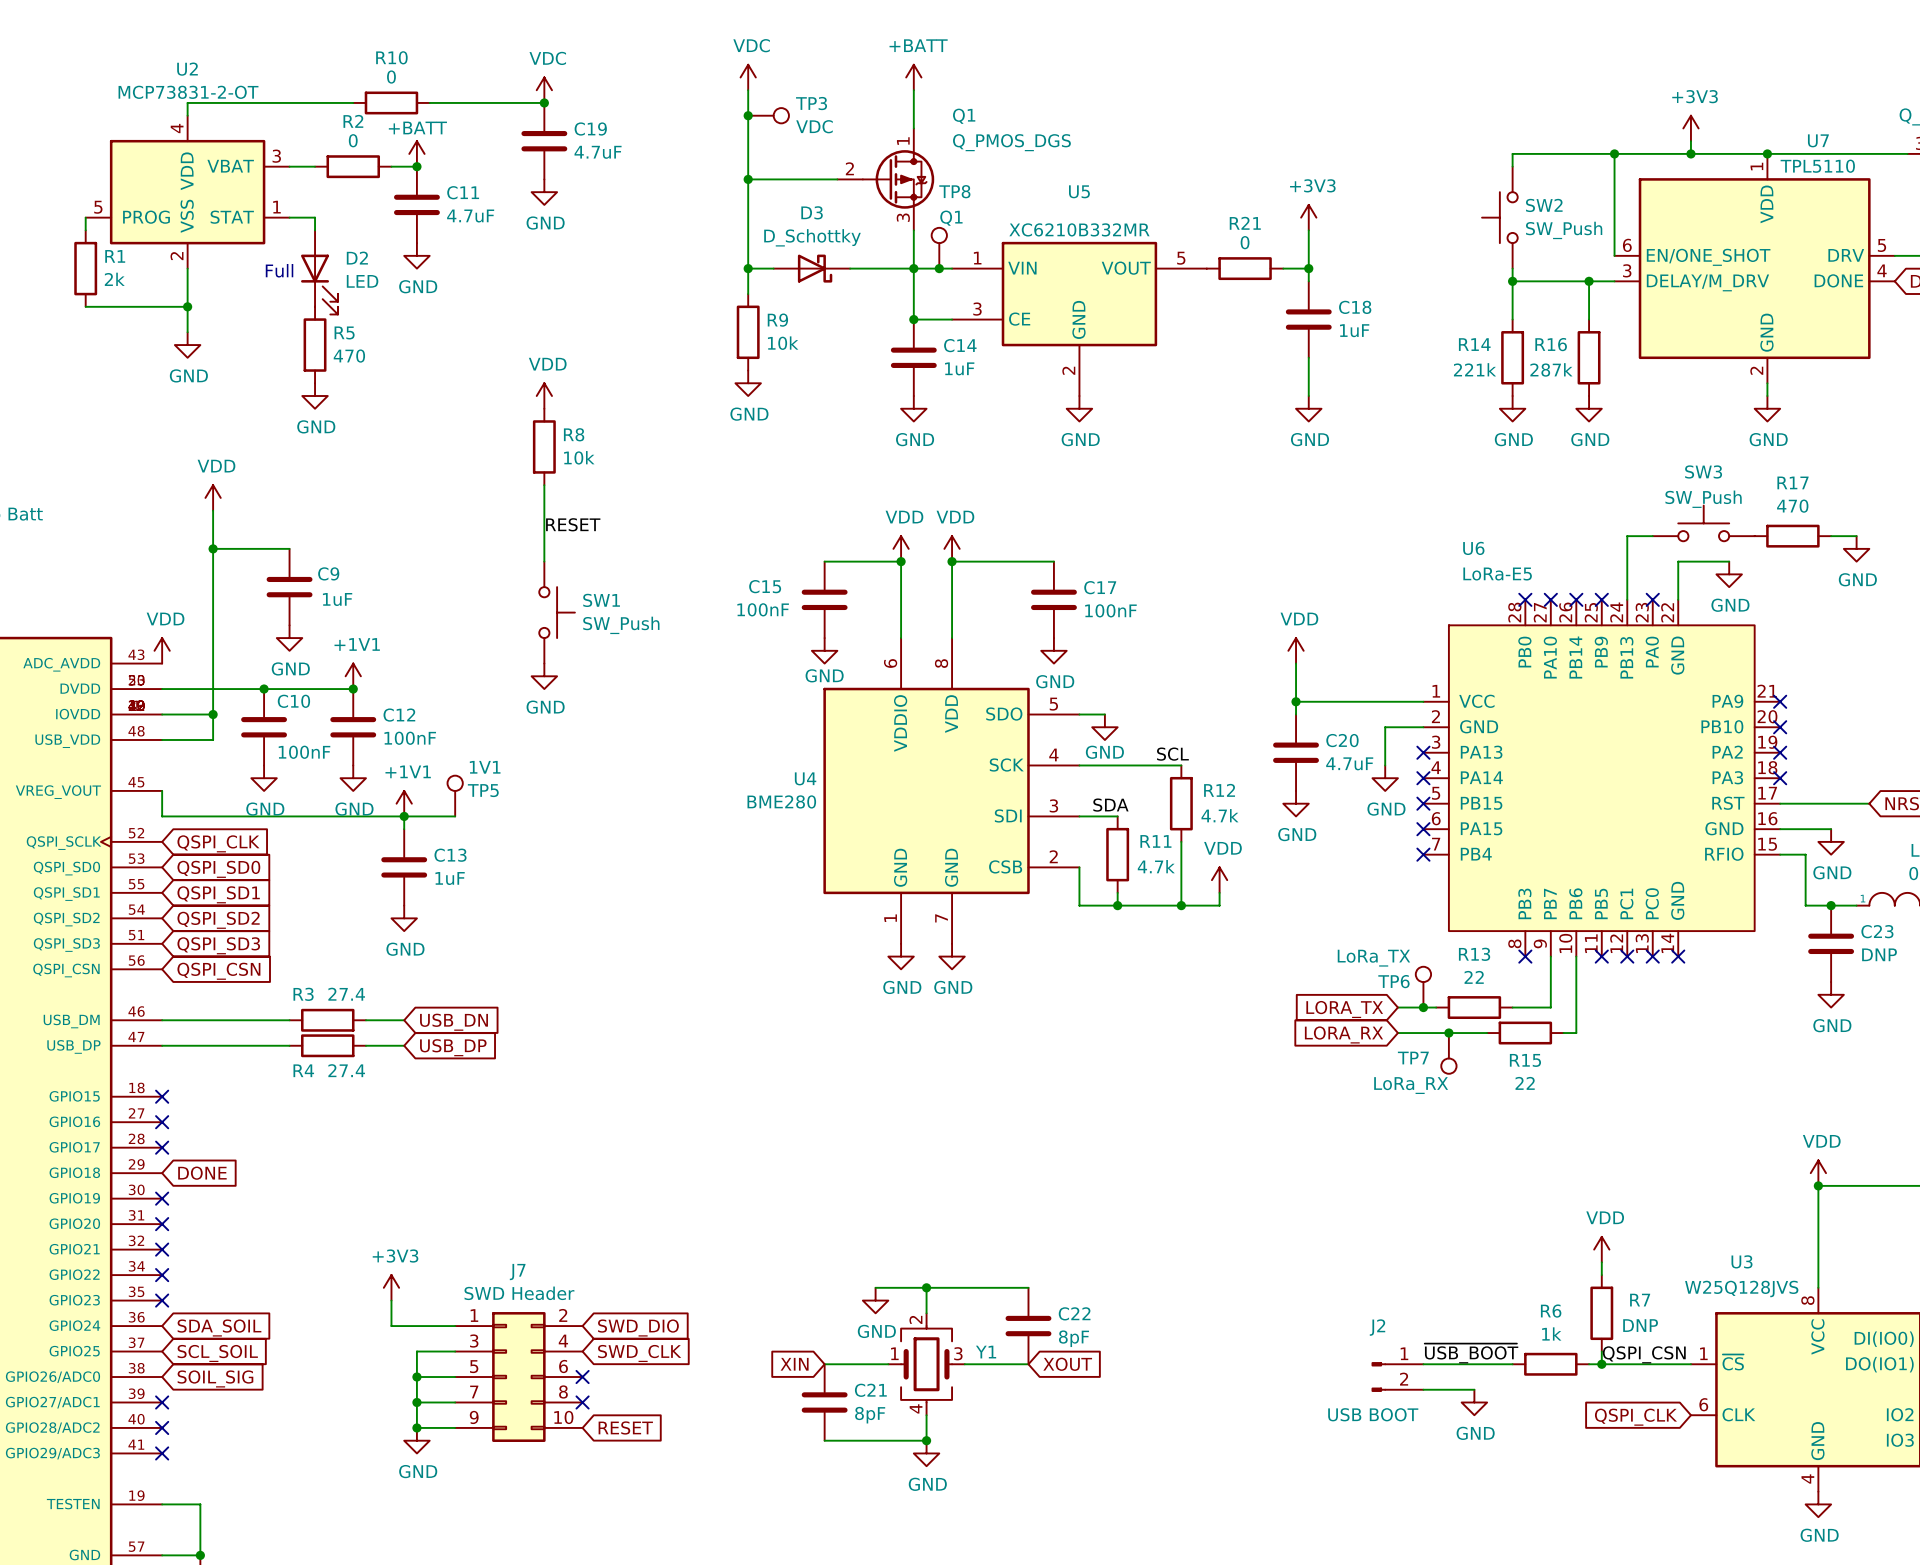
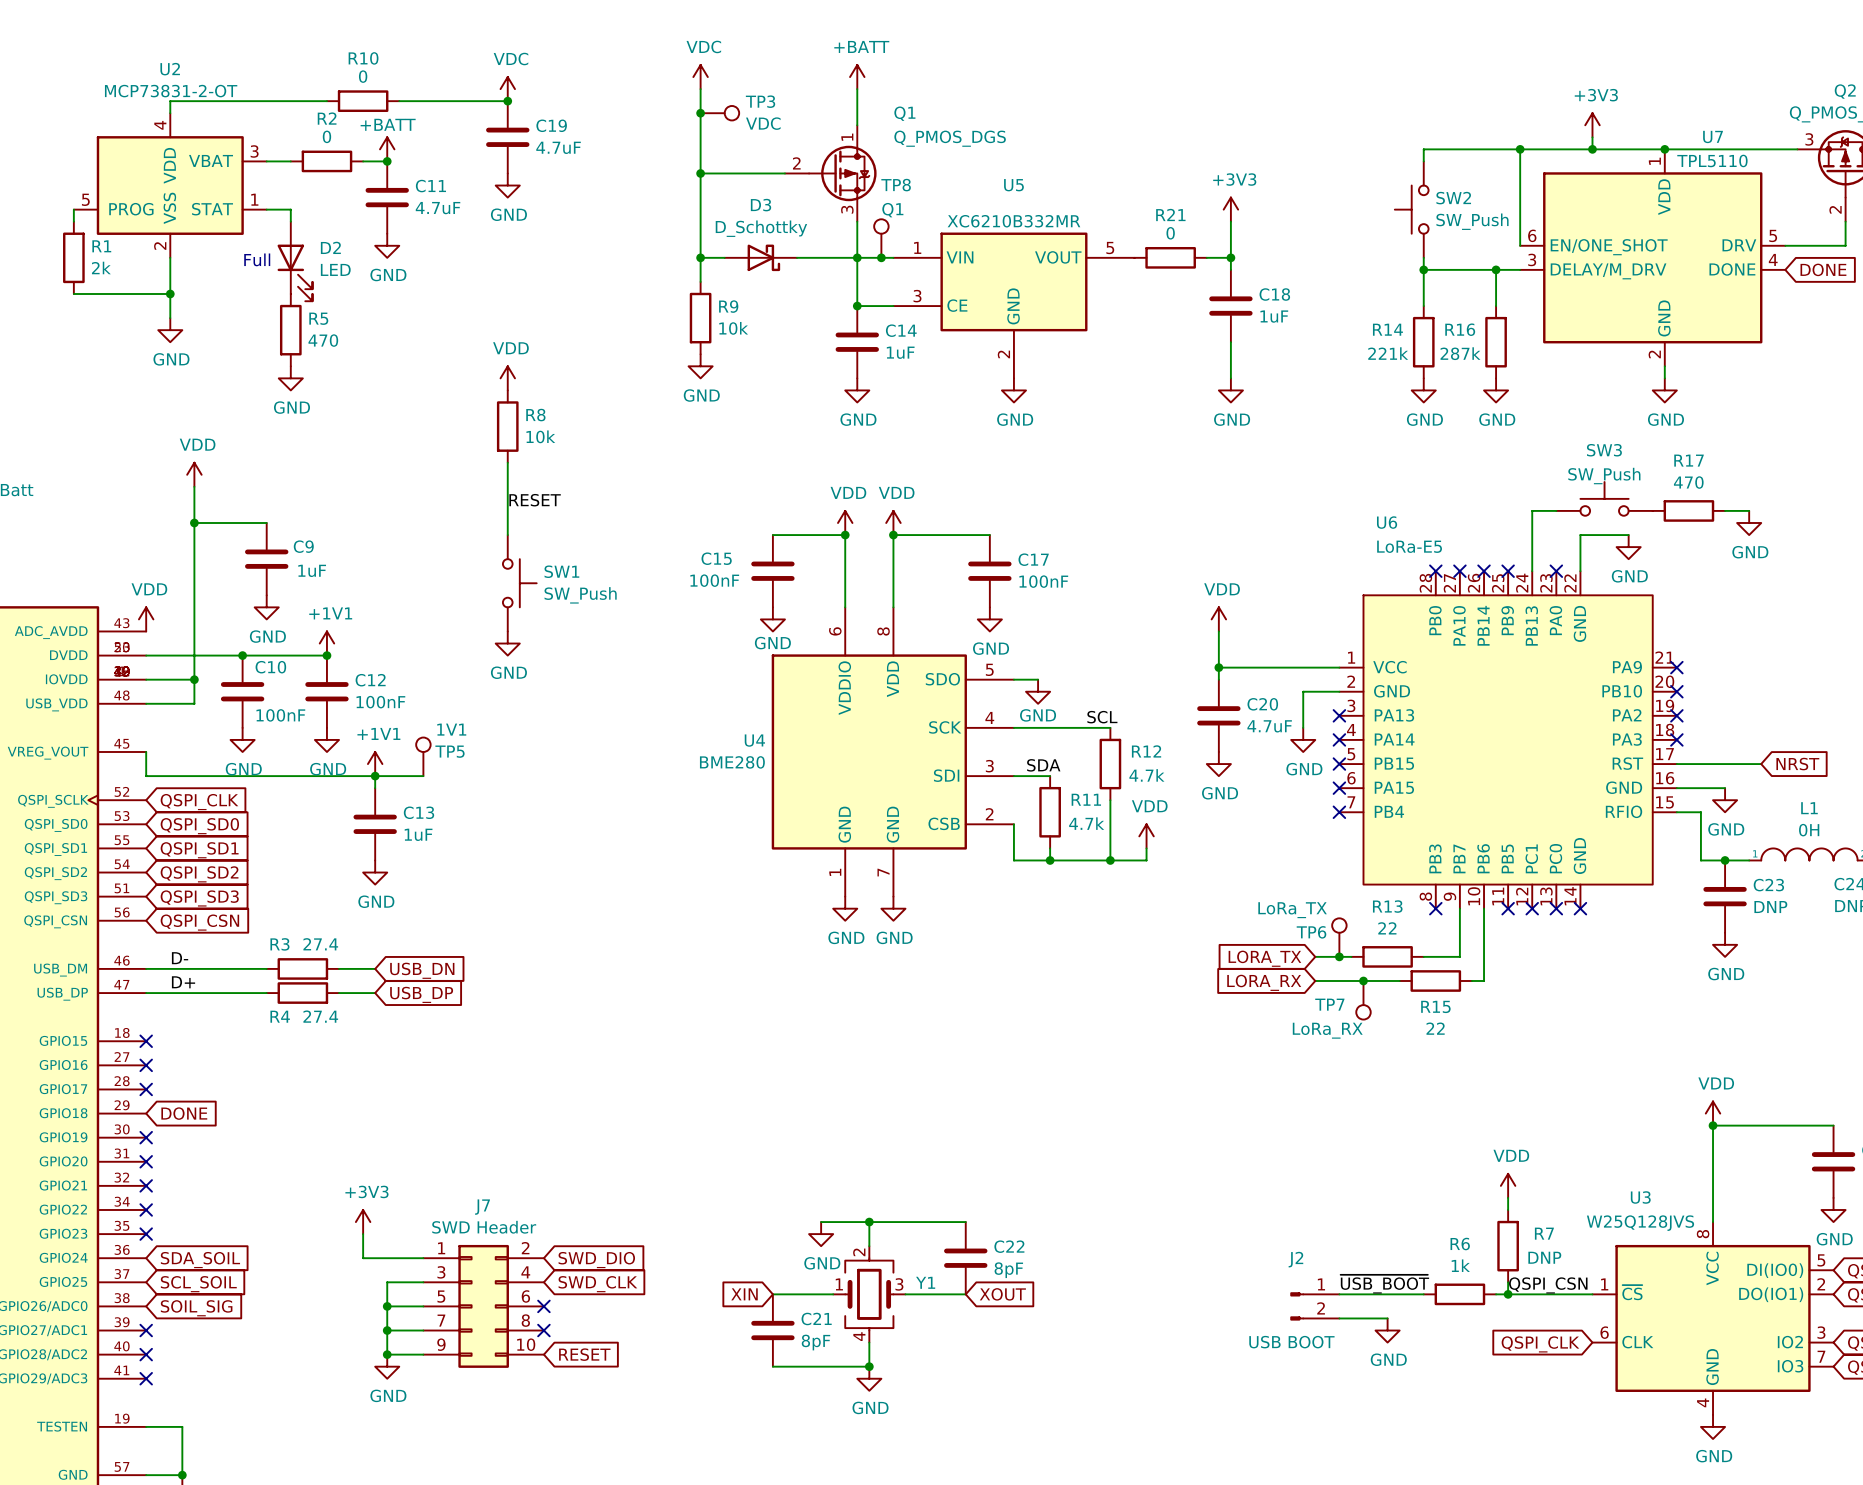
label: none -> D- (180, 958)
label: none -> D+ (183, 982)

